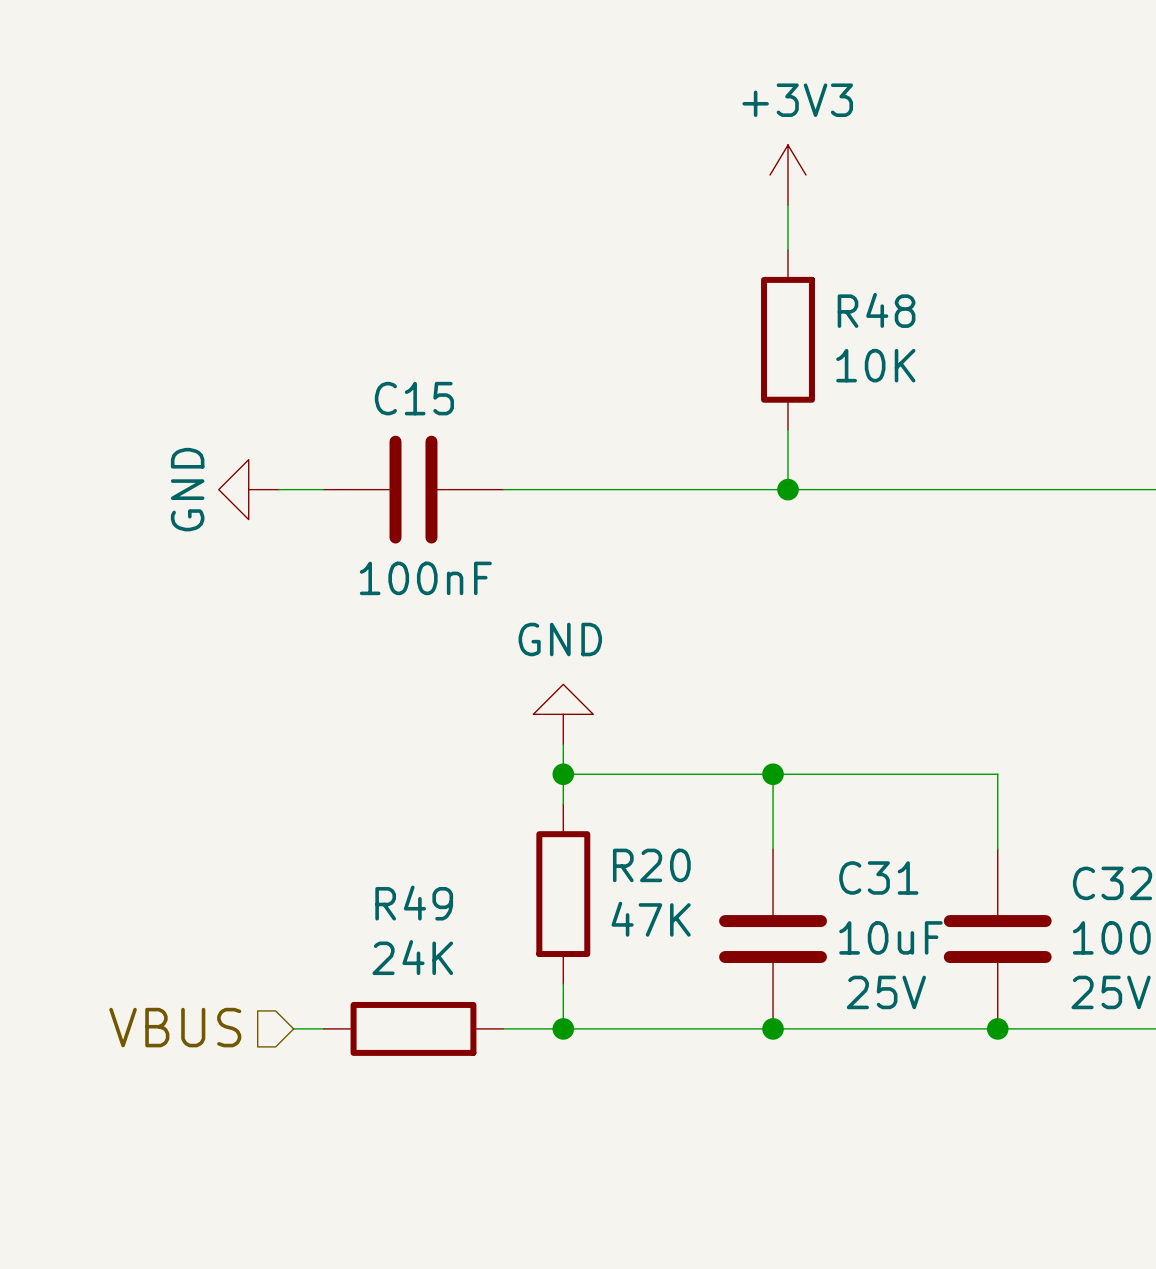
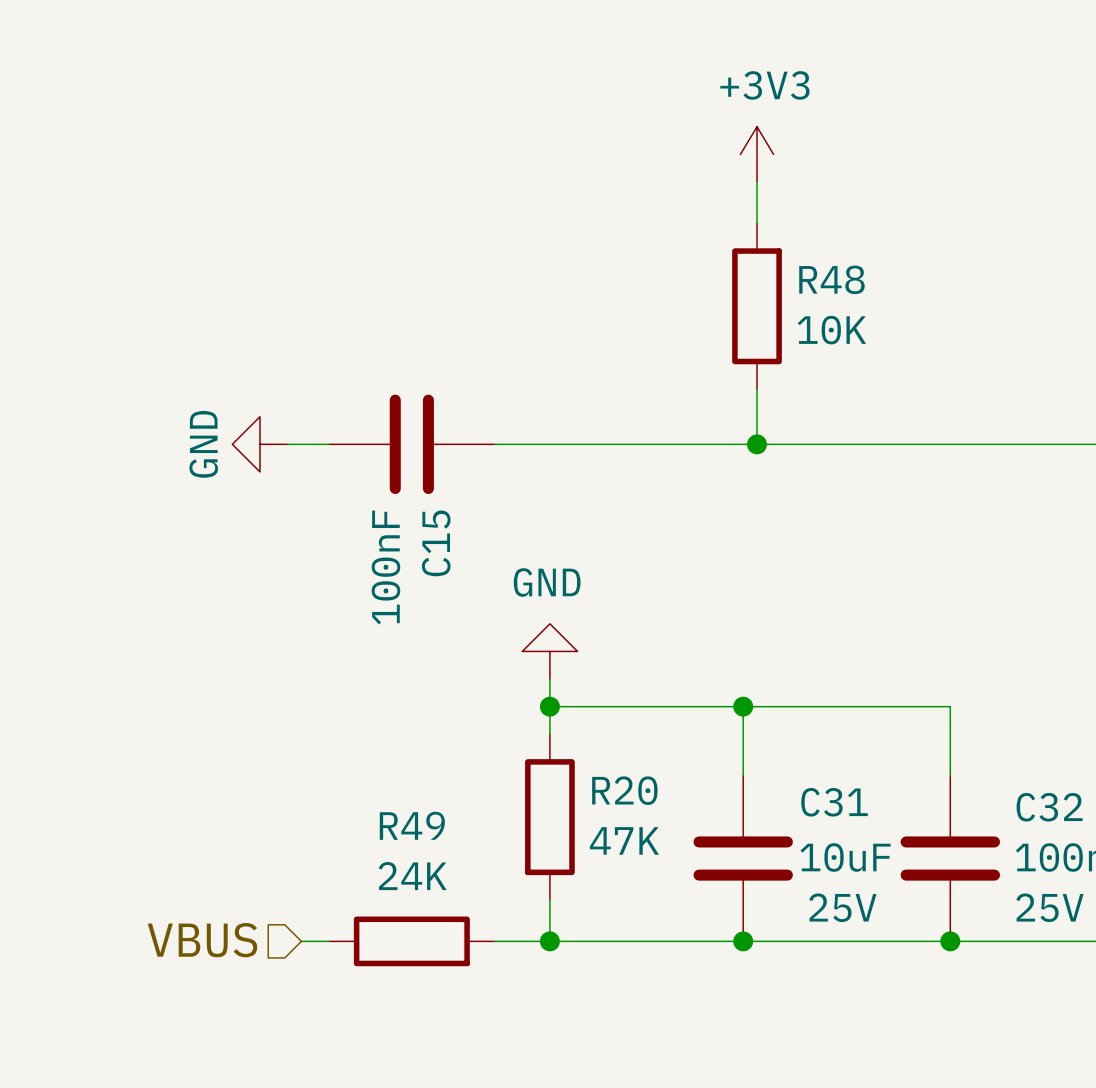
C15 name rotation: 0° (414, 398) -> 90° counterclockwise (436, 543)
C15 name position: C15 (414, 398) -> C15 (436, 543)
C15 value rotation: 0° (425, 578) -> 90° counterclockwise (385, 567)

